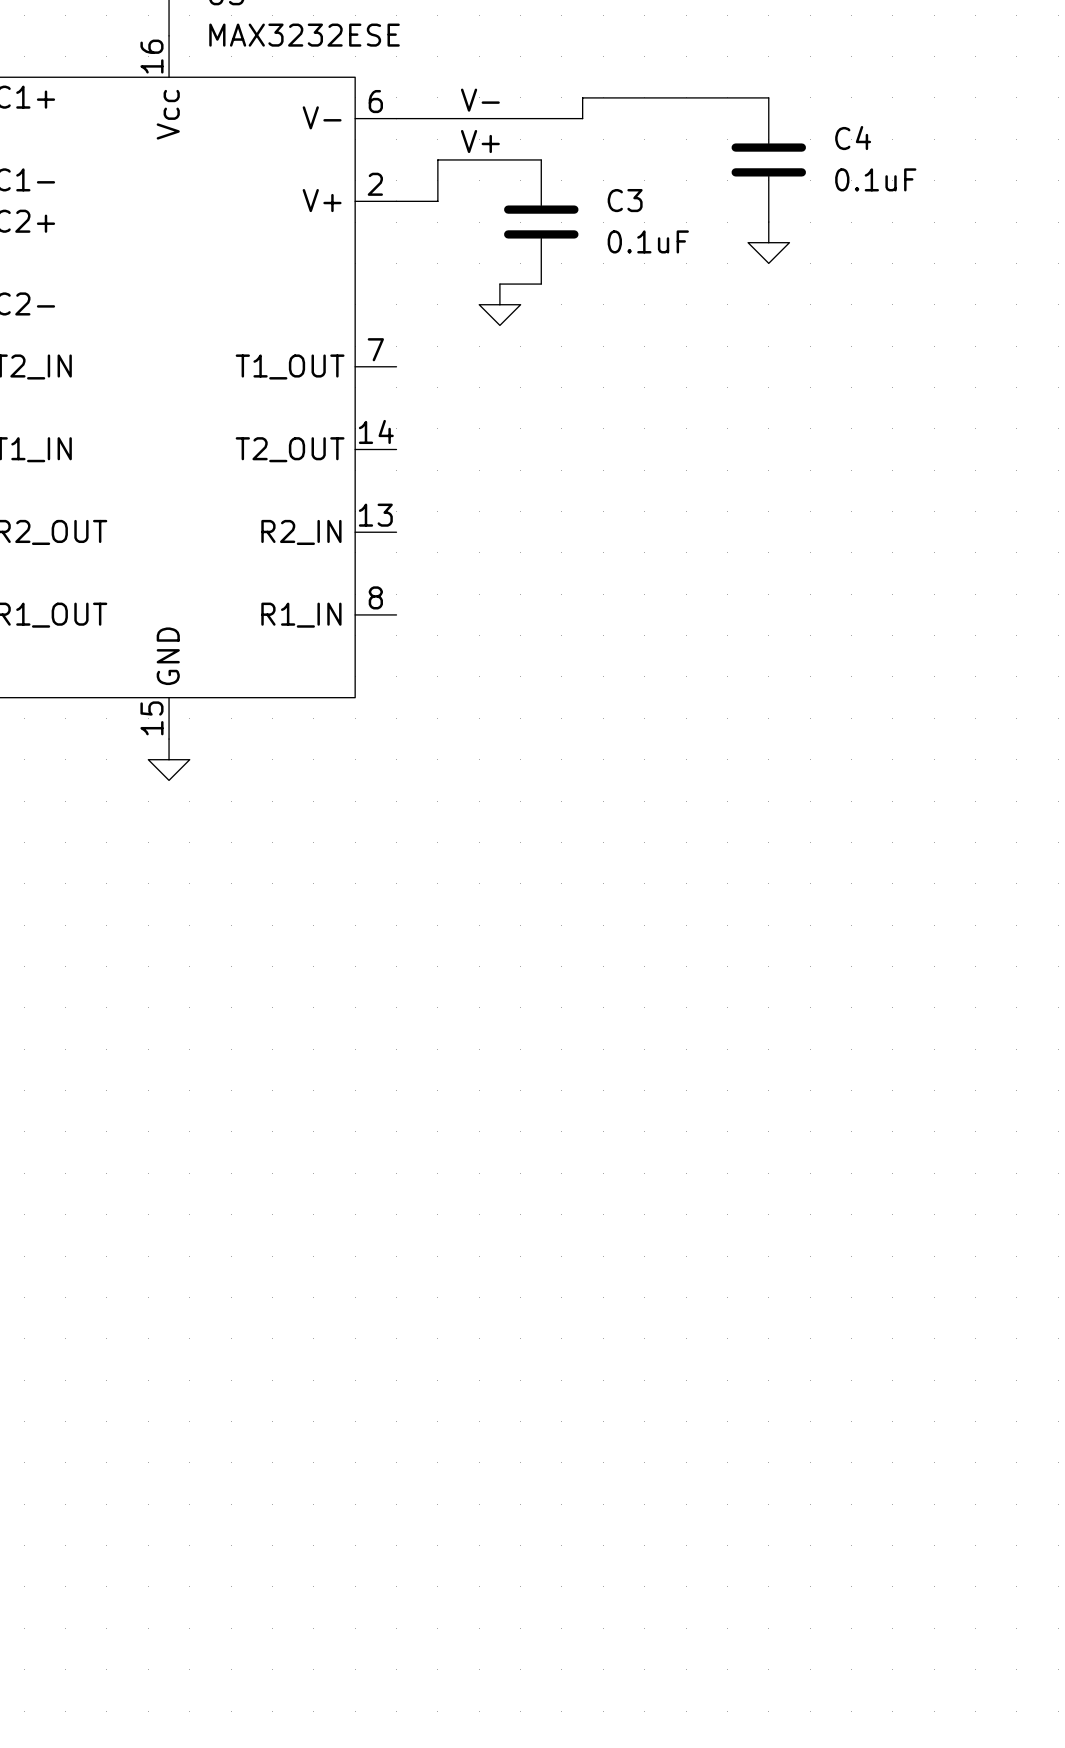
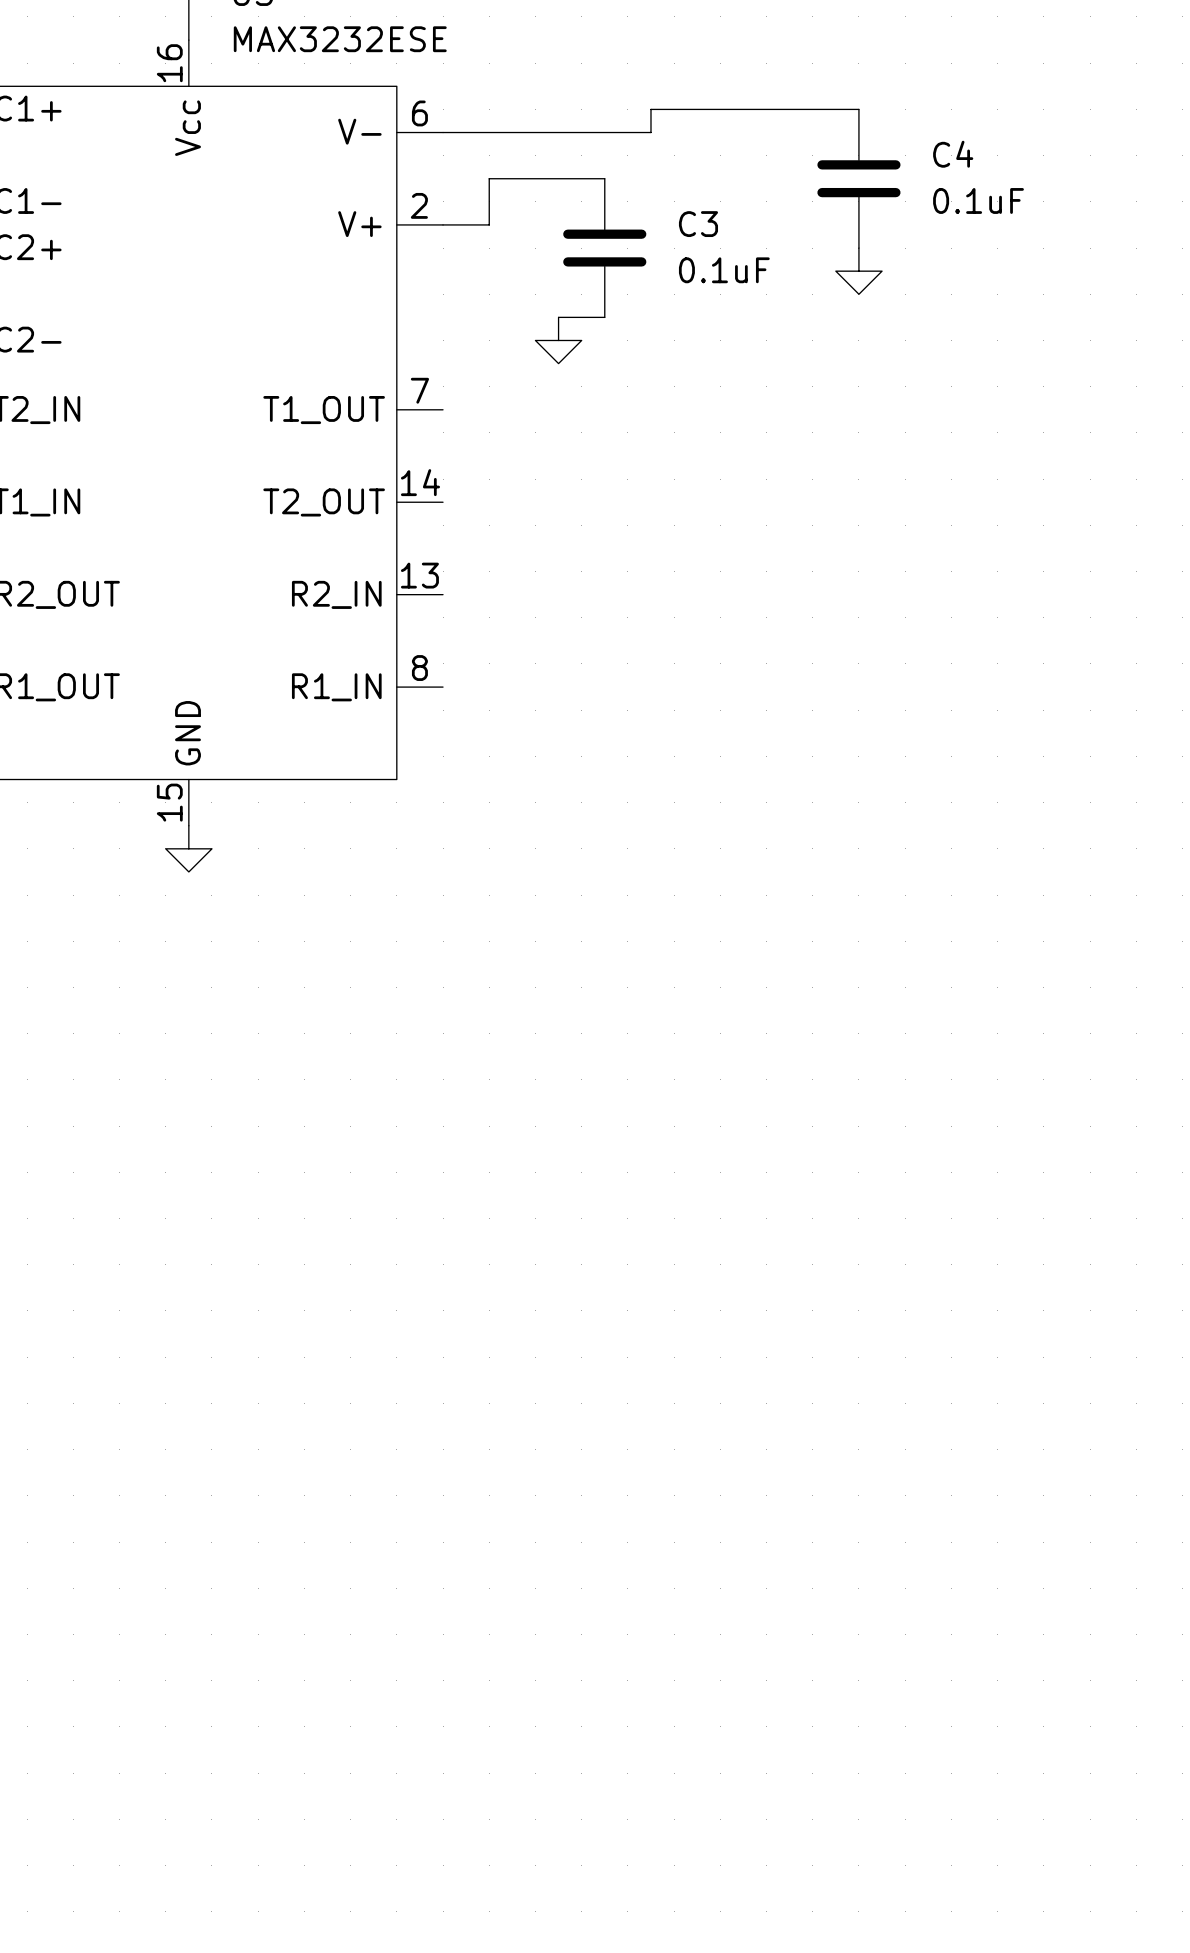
label: V- (480, 100) -> none
label: V+ (480, 141) -> none

